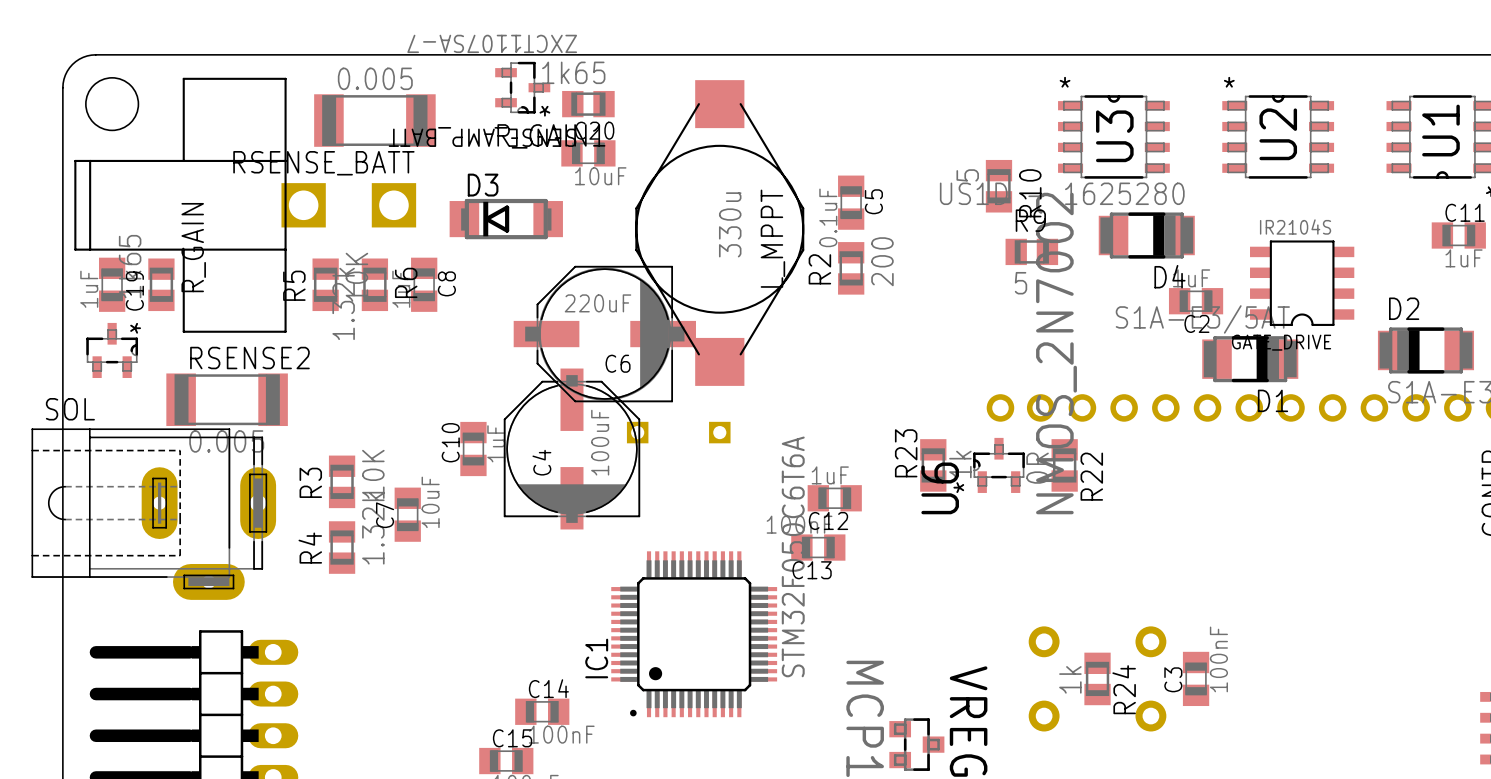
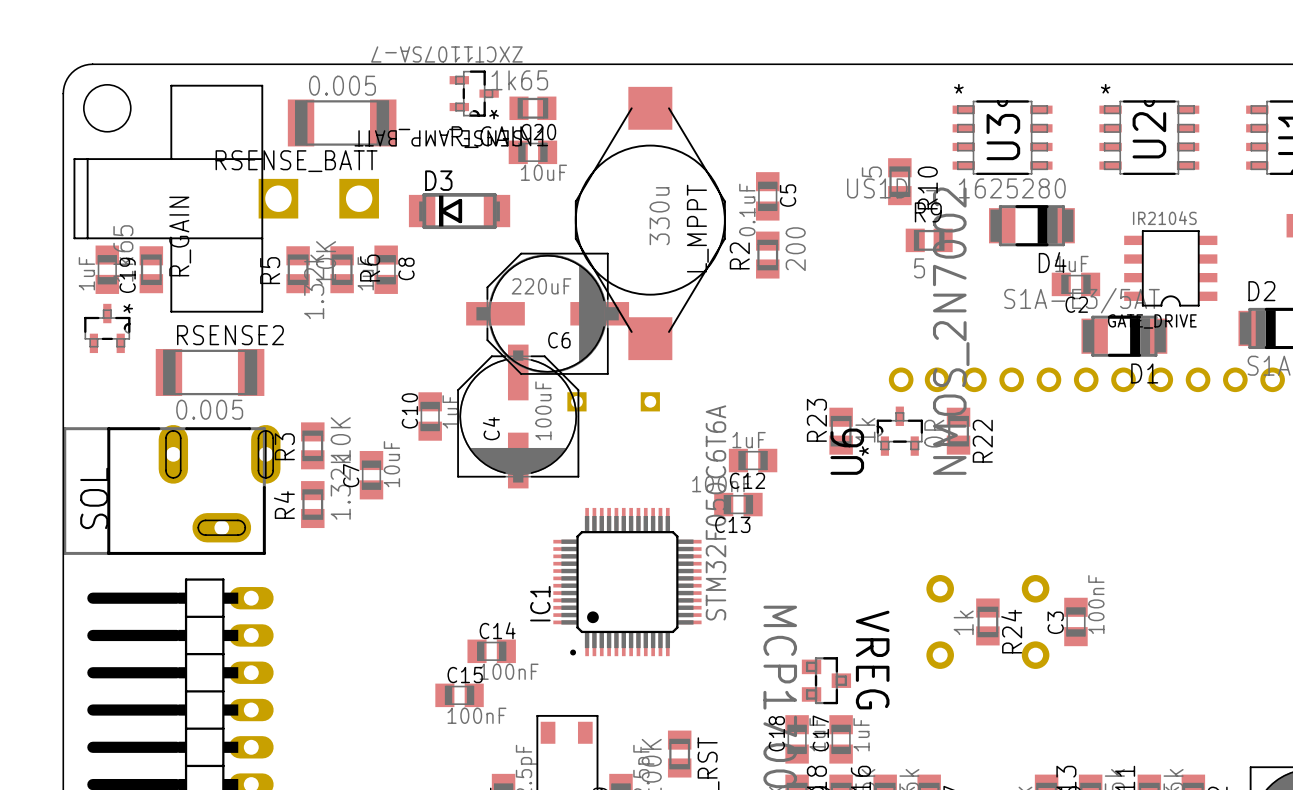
SOL: (153, 514) -> none
SOL: none -> (171, 489)

